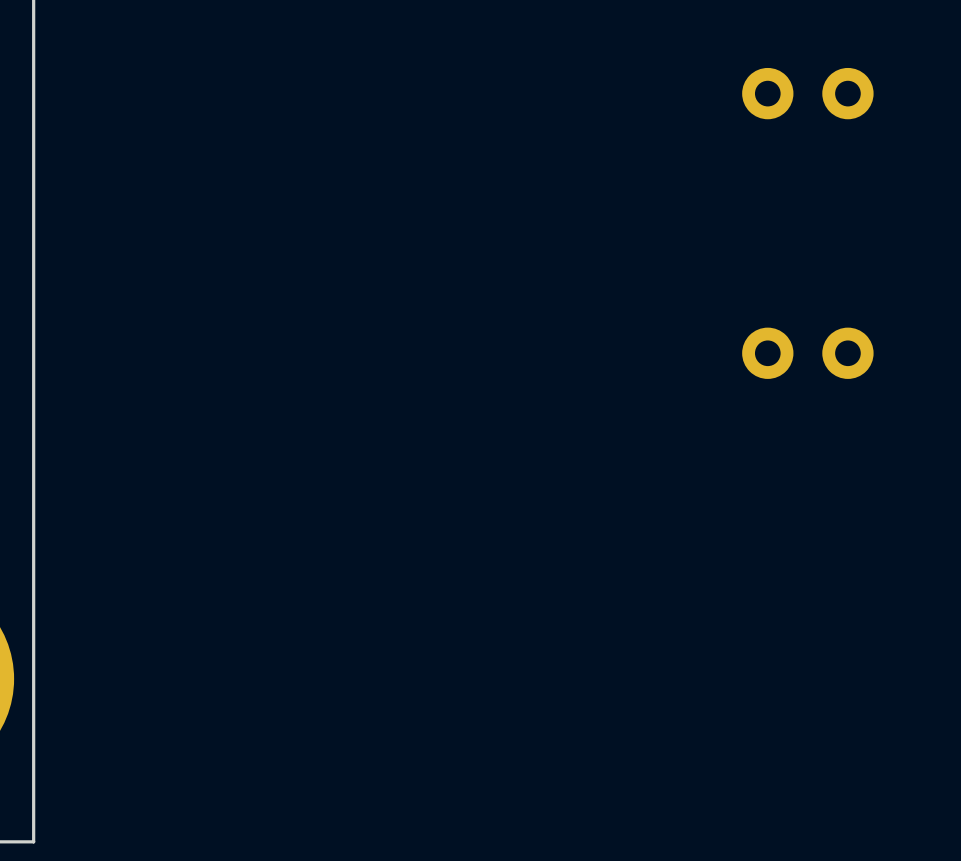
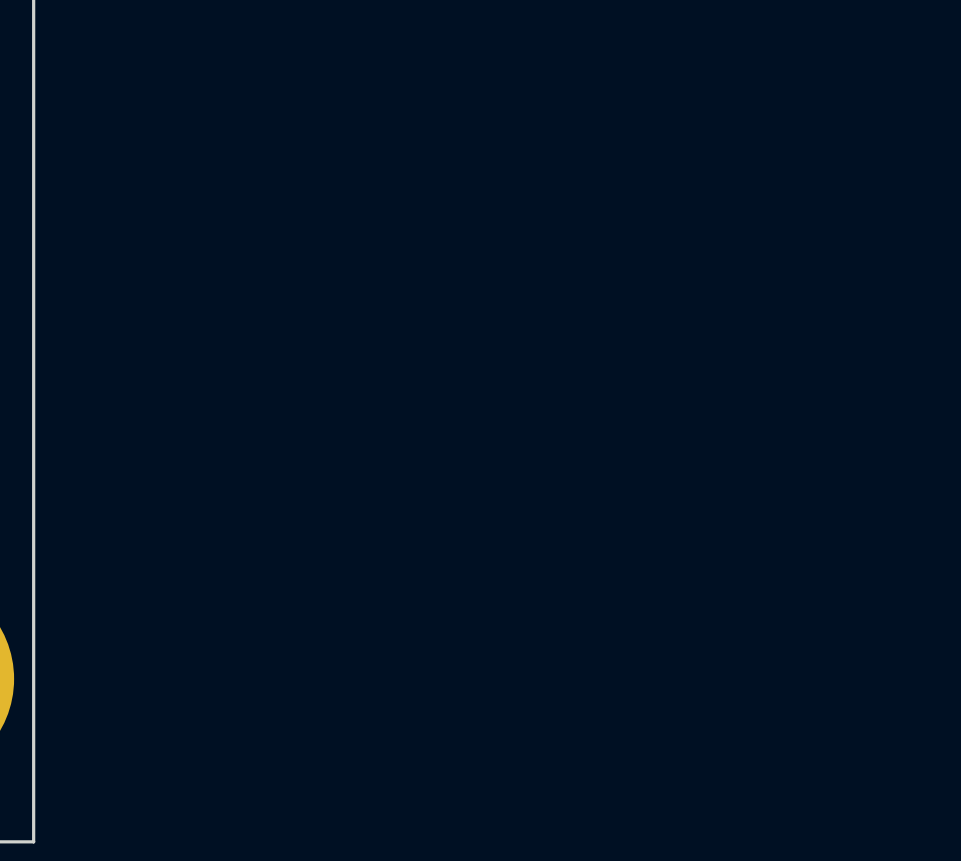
part: (807, 93) -> none
part: (807, 353) -> none

